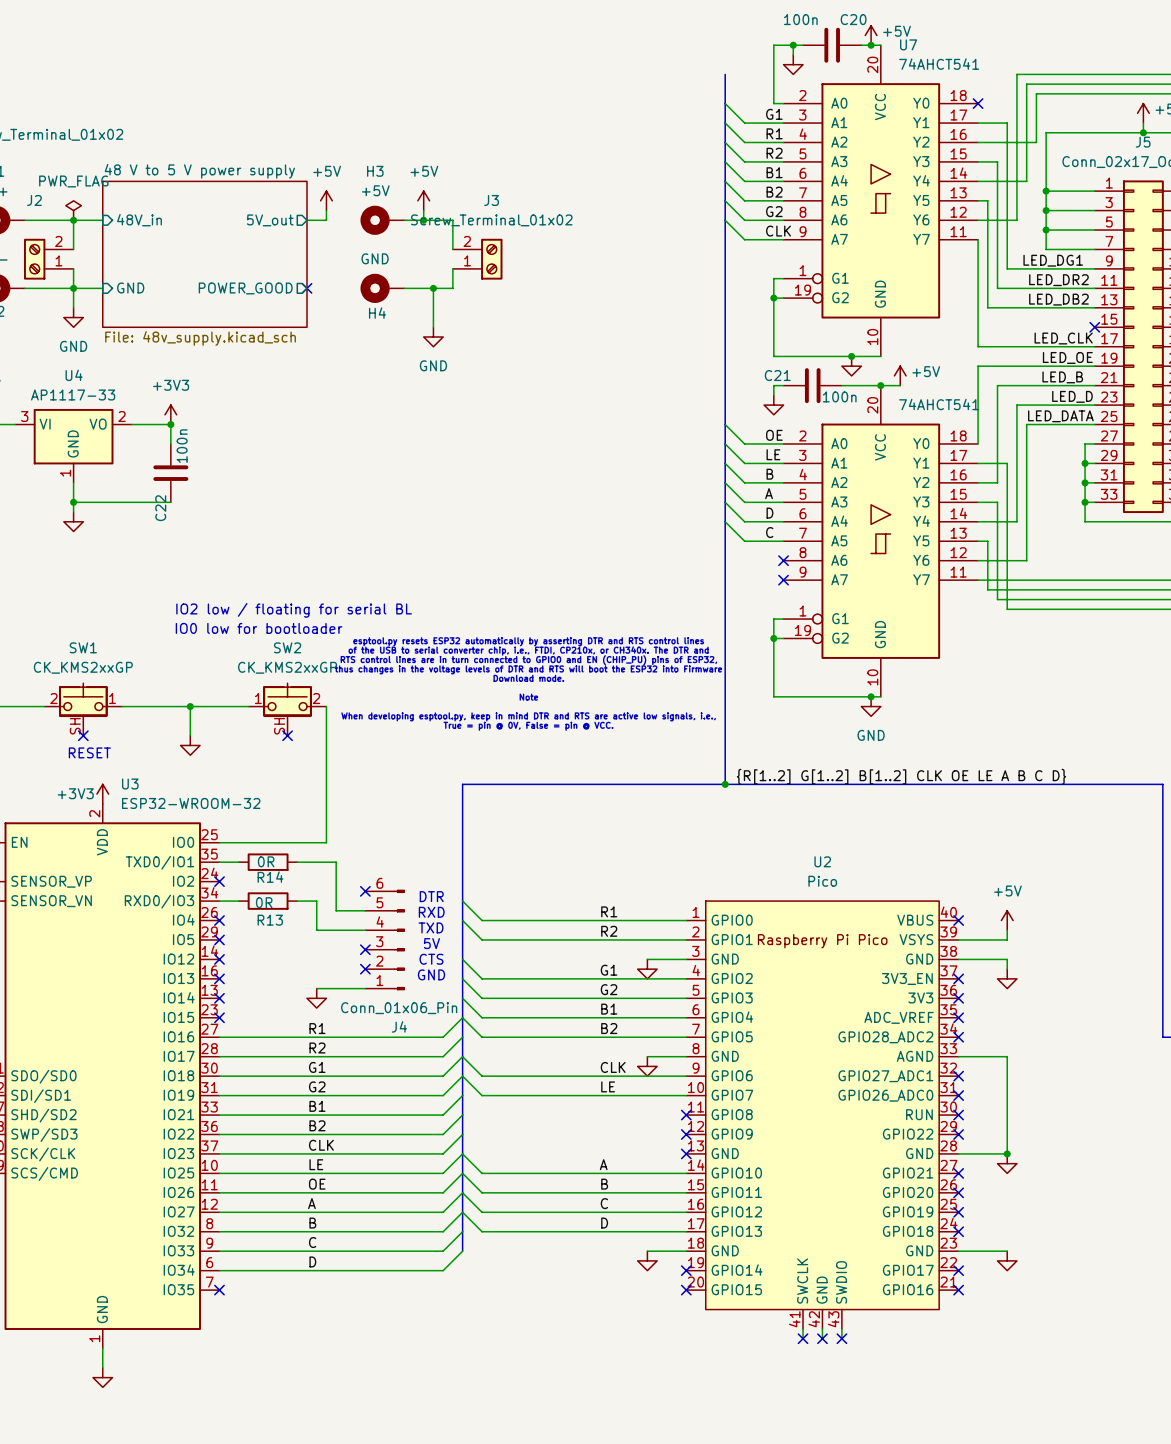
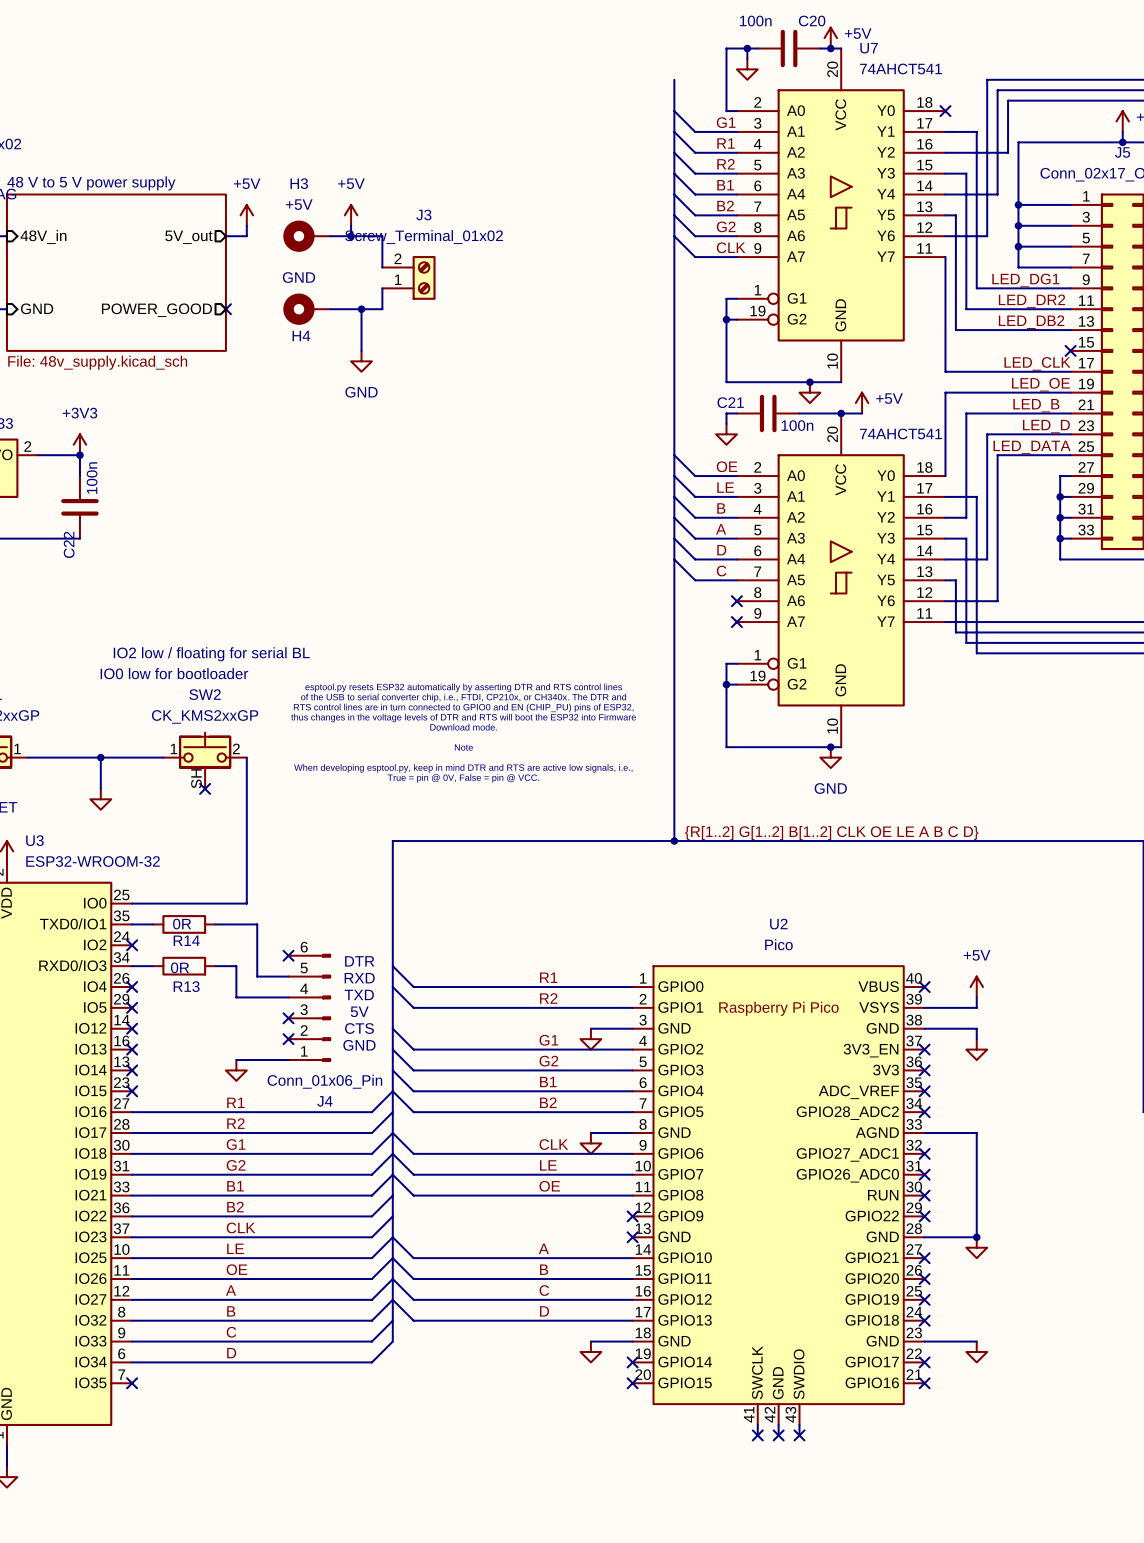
wire: none -> (392, 1174) (413, 1195) (632, 1195)
label: none -> OE (549, 1186)
no-connect mark: (686, 1115) -> none

